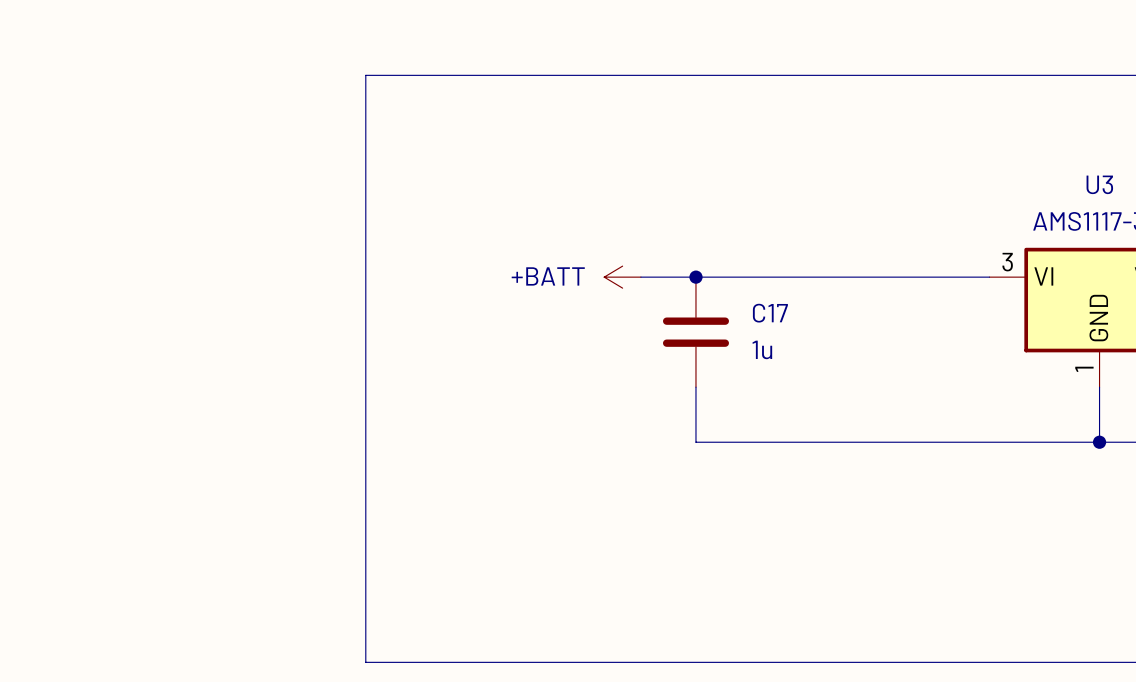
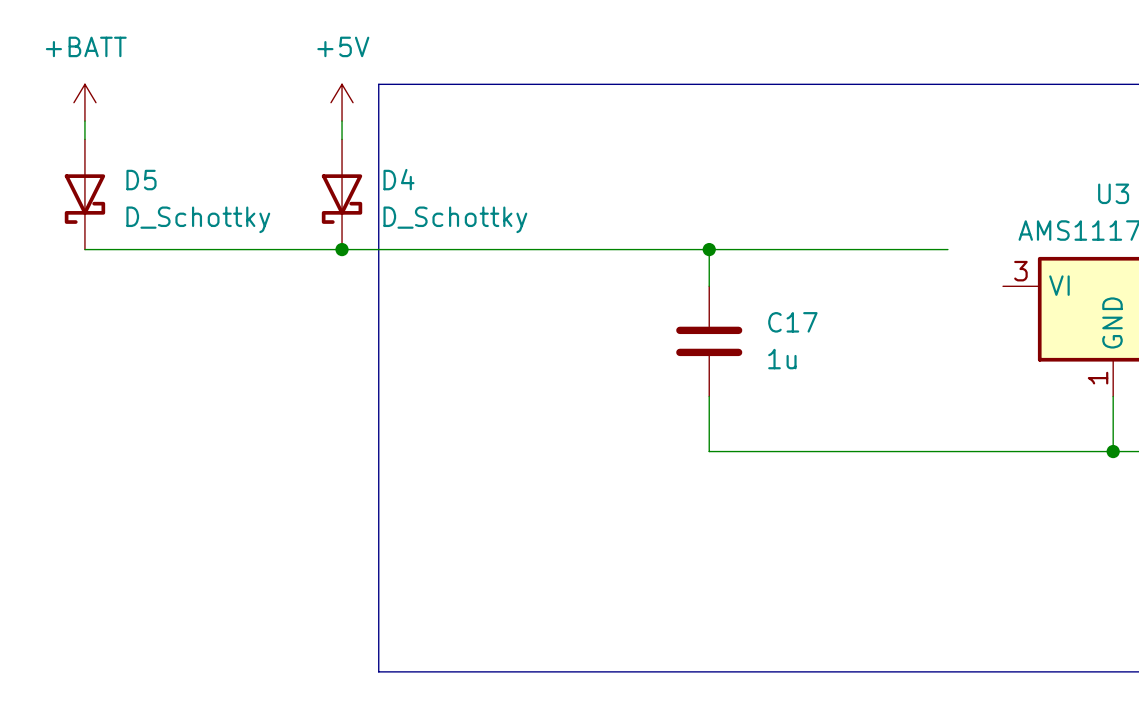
power symbol: none -> +BATT (84, 102)
power symbol: none -> +5V (342, 102)
wire: none -> (84, 121) (84, 139)
wire: none -> (342, 121) (342, 139)
D5: none -> D_Schottky (84, 194)
D4: none -> D_Schottky (342, 194)
wire: none -> (84, 249) (947, 249)
junction: none -> (342, 249)
wire: none -> (709, 249) (709, 286)
power symbol: +BATT (622, 277) -> none
wire: (640, 277) (989, 277) -> none
junction position: (695, 277) -> (709, 249)

